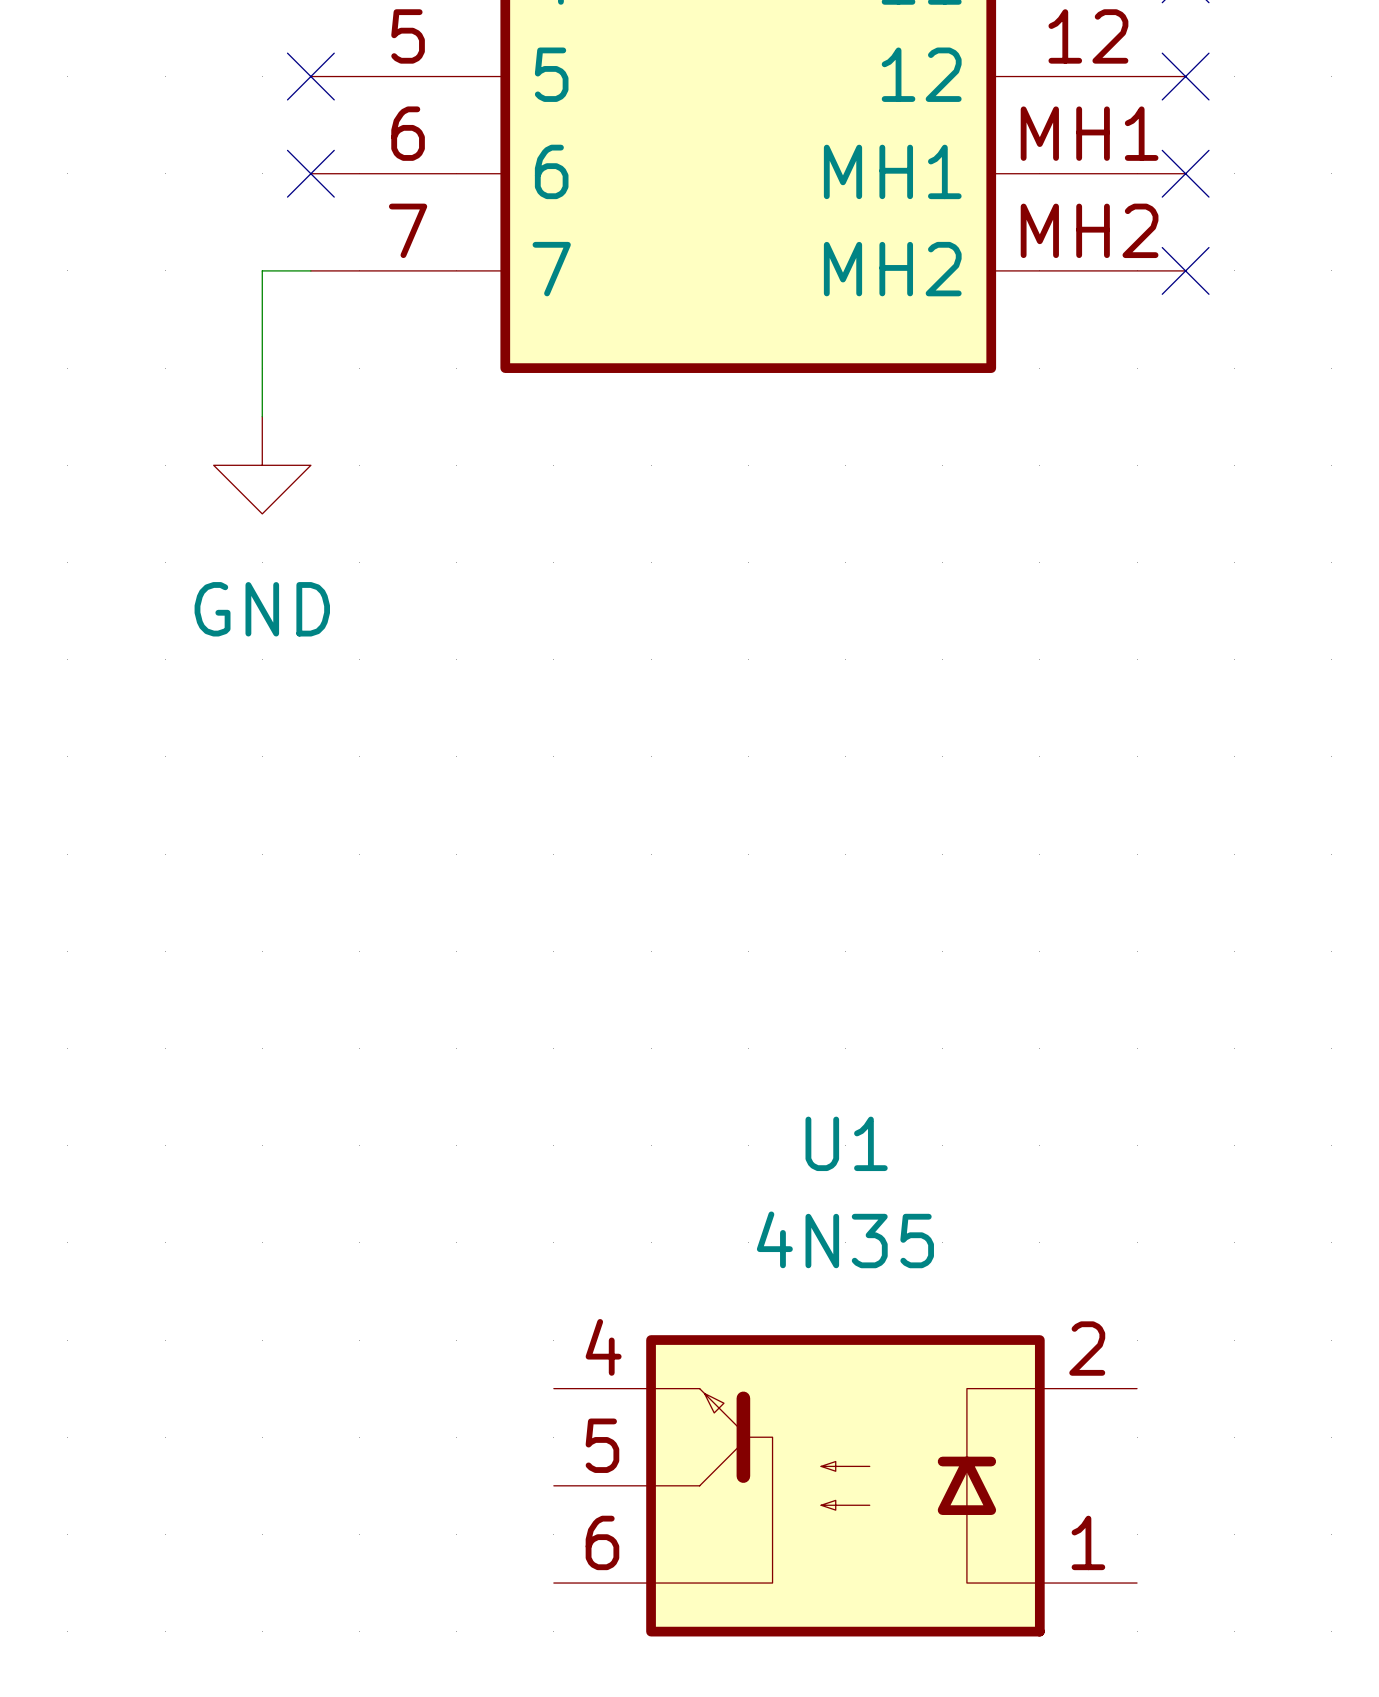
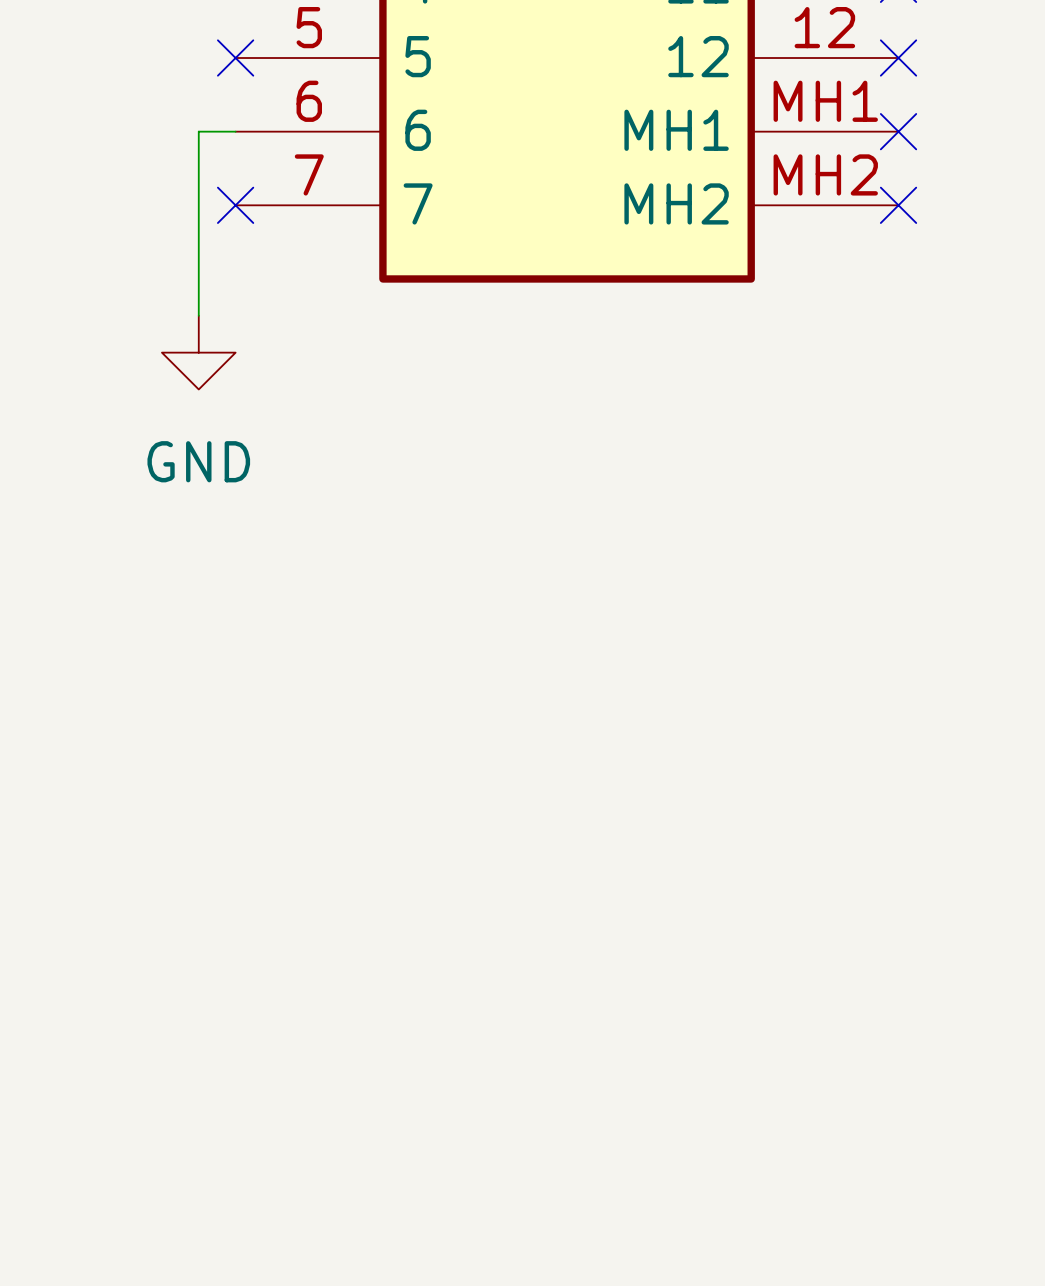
no-connect mark position: (310, 173) -> (235, 205)
wire: (262, 270) (310, 270) -> (198, 205) (198, 131) (235, 131)
U1: 4N35 (845, 1485) -> none

